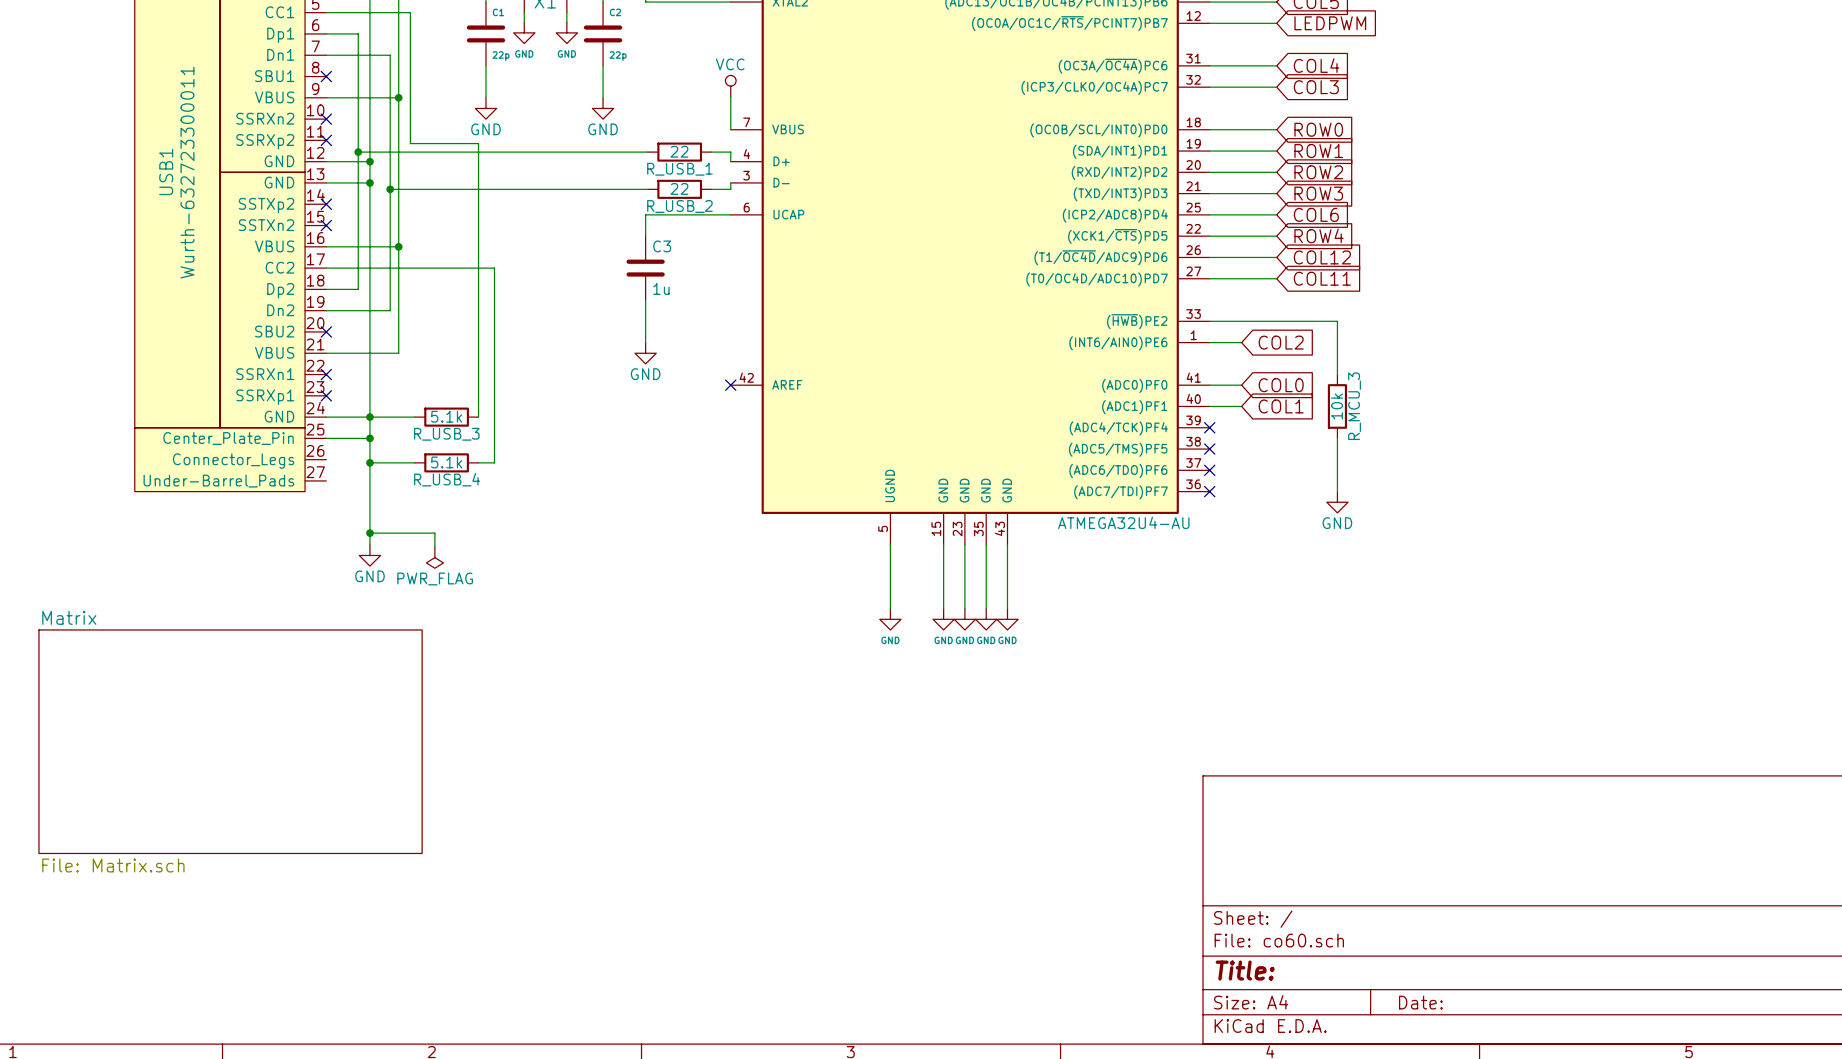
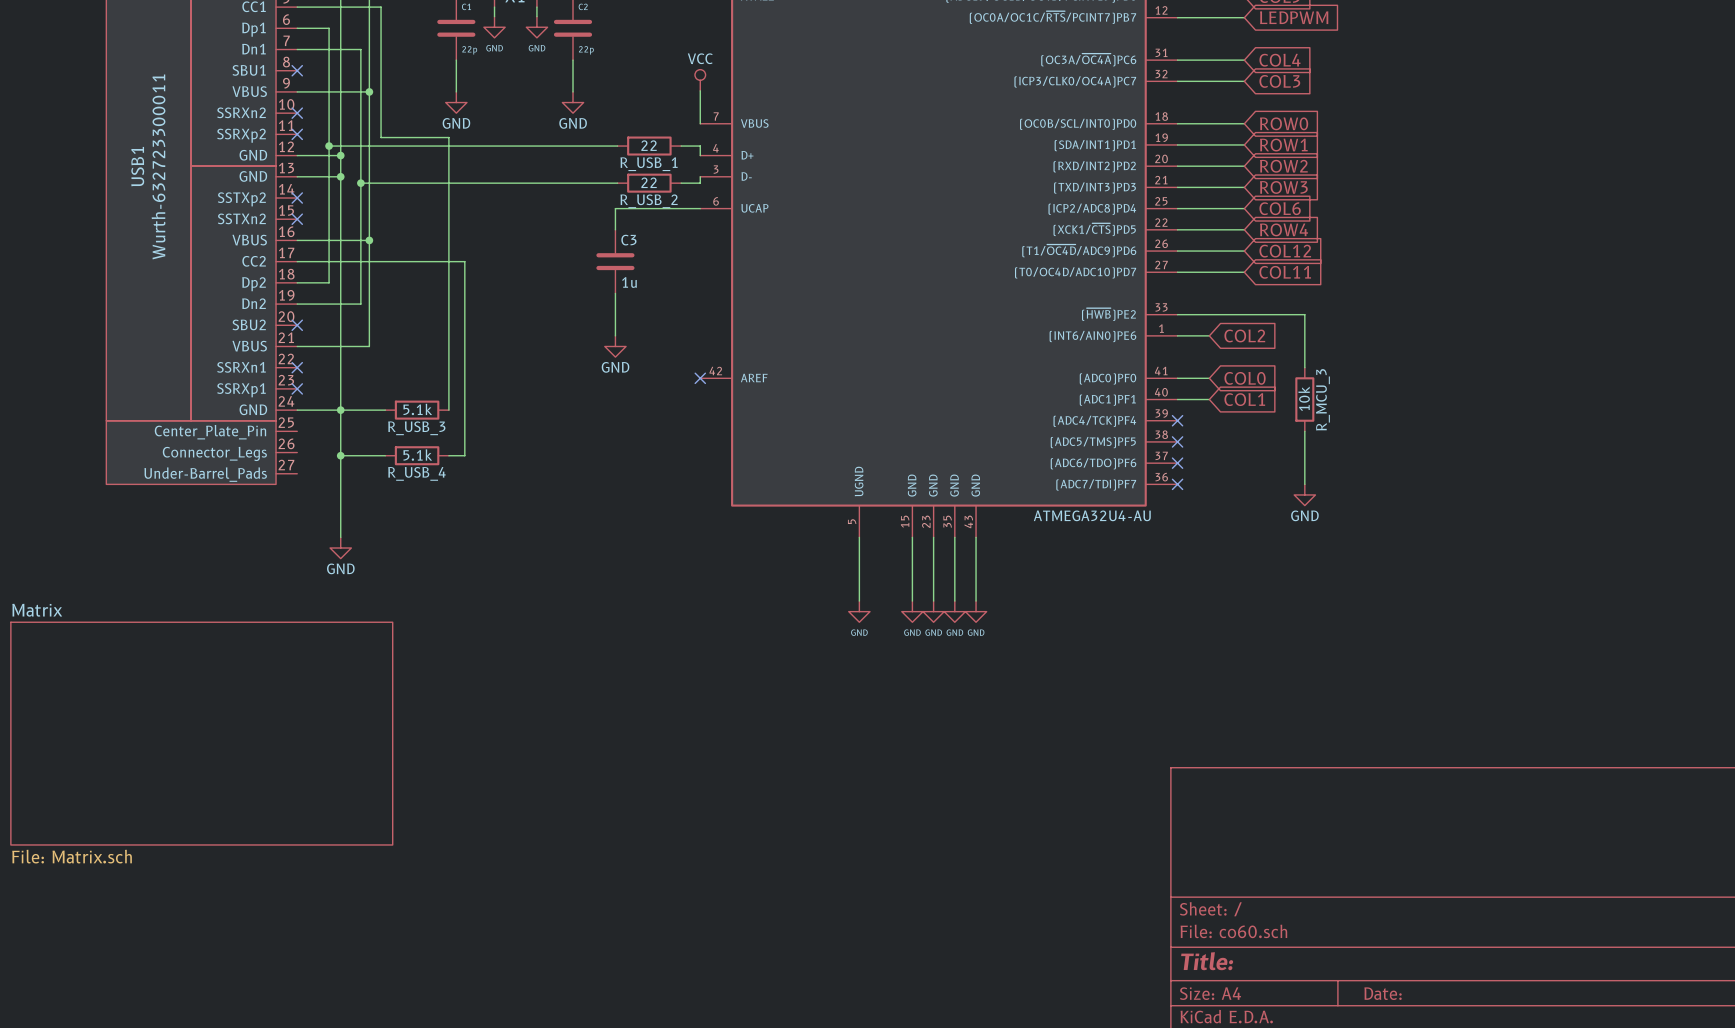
wire: (326, 438) (369, 438) -> none
junction: (369, 438) -> none
wire: (369, 533) (434, 533) (434, 546) -> none
junction: (369, 533) -> none
power symbol: PWR_FLAG (434, 557) -> none

